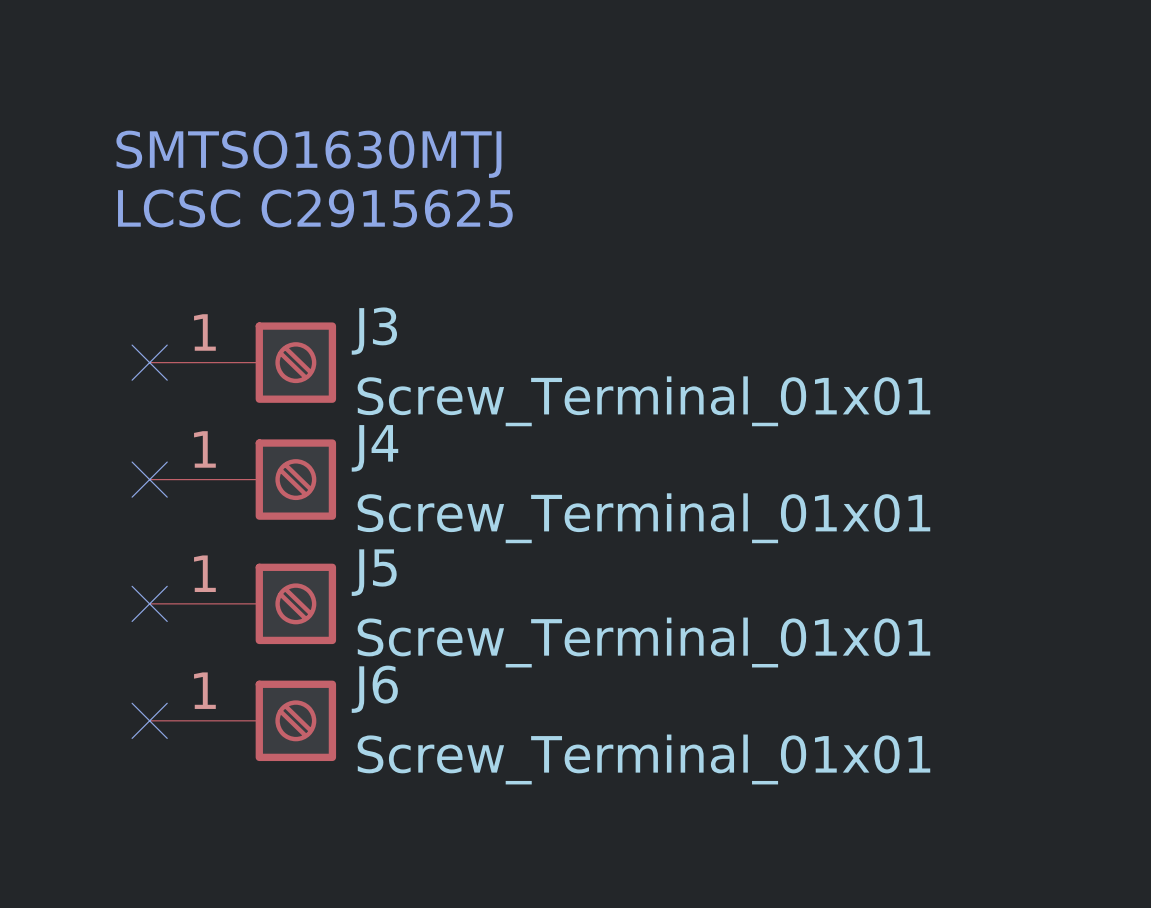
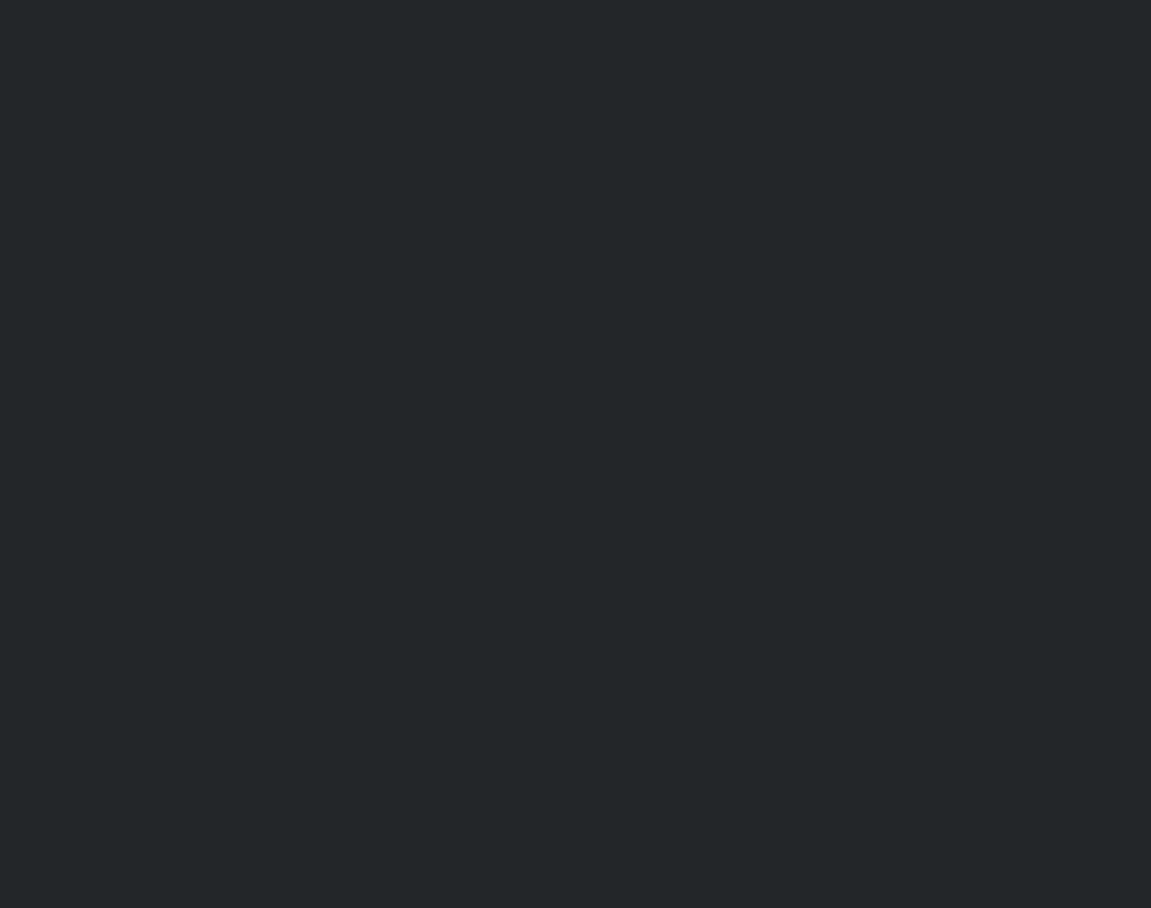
text: SMTSO1630MTJ (308, 154) -> none
text: LCSC C2915625 (315, 208) -> none
no-connect mark: (149, 362) -> none
J3: Screw_Terminal_01x01 (242, 362) -> none
no-connect mark: (149, 479) -> none
J4: Screw_Terminal_01x01 (242, 479) -> none
no-connect mark: (149, 603) -> none
J5: Screw_Terminal_01x01 (242, 603) -> none
no-connect mark: (149, 720) -> none
J6: Screw_Terminal_01x01 (242, 720) -> none

